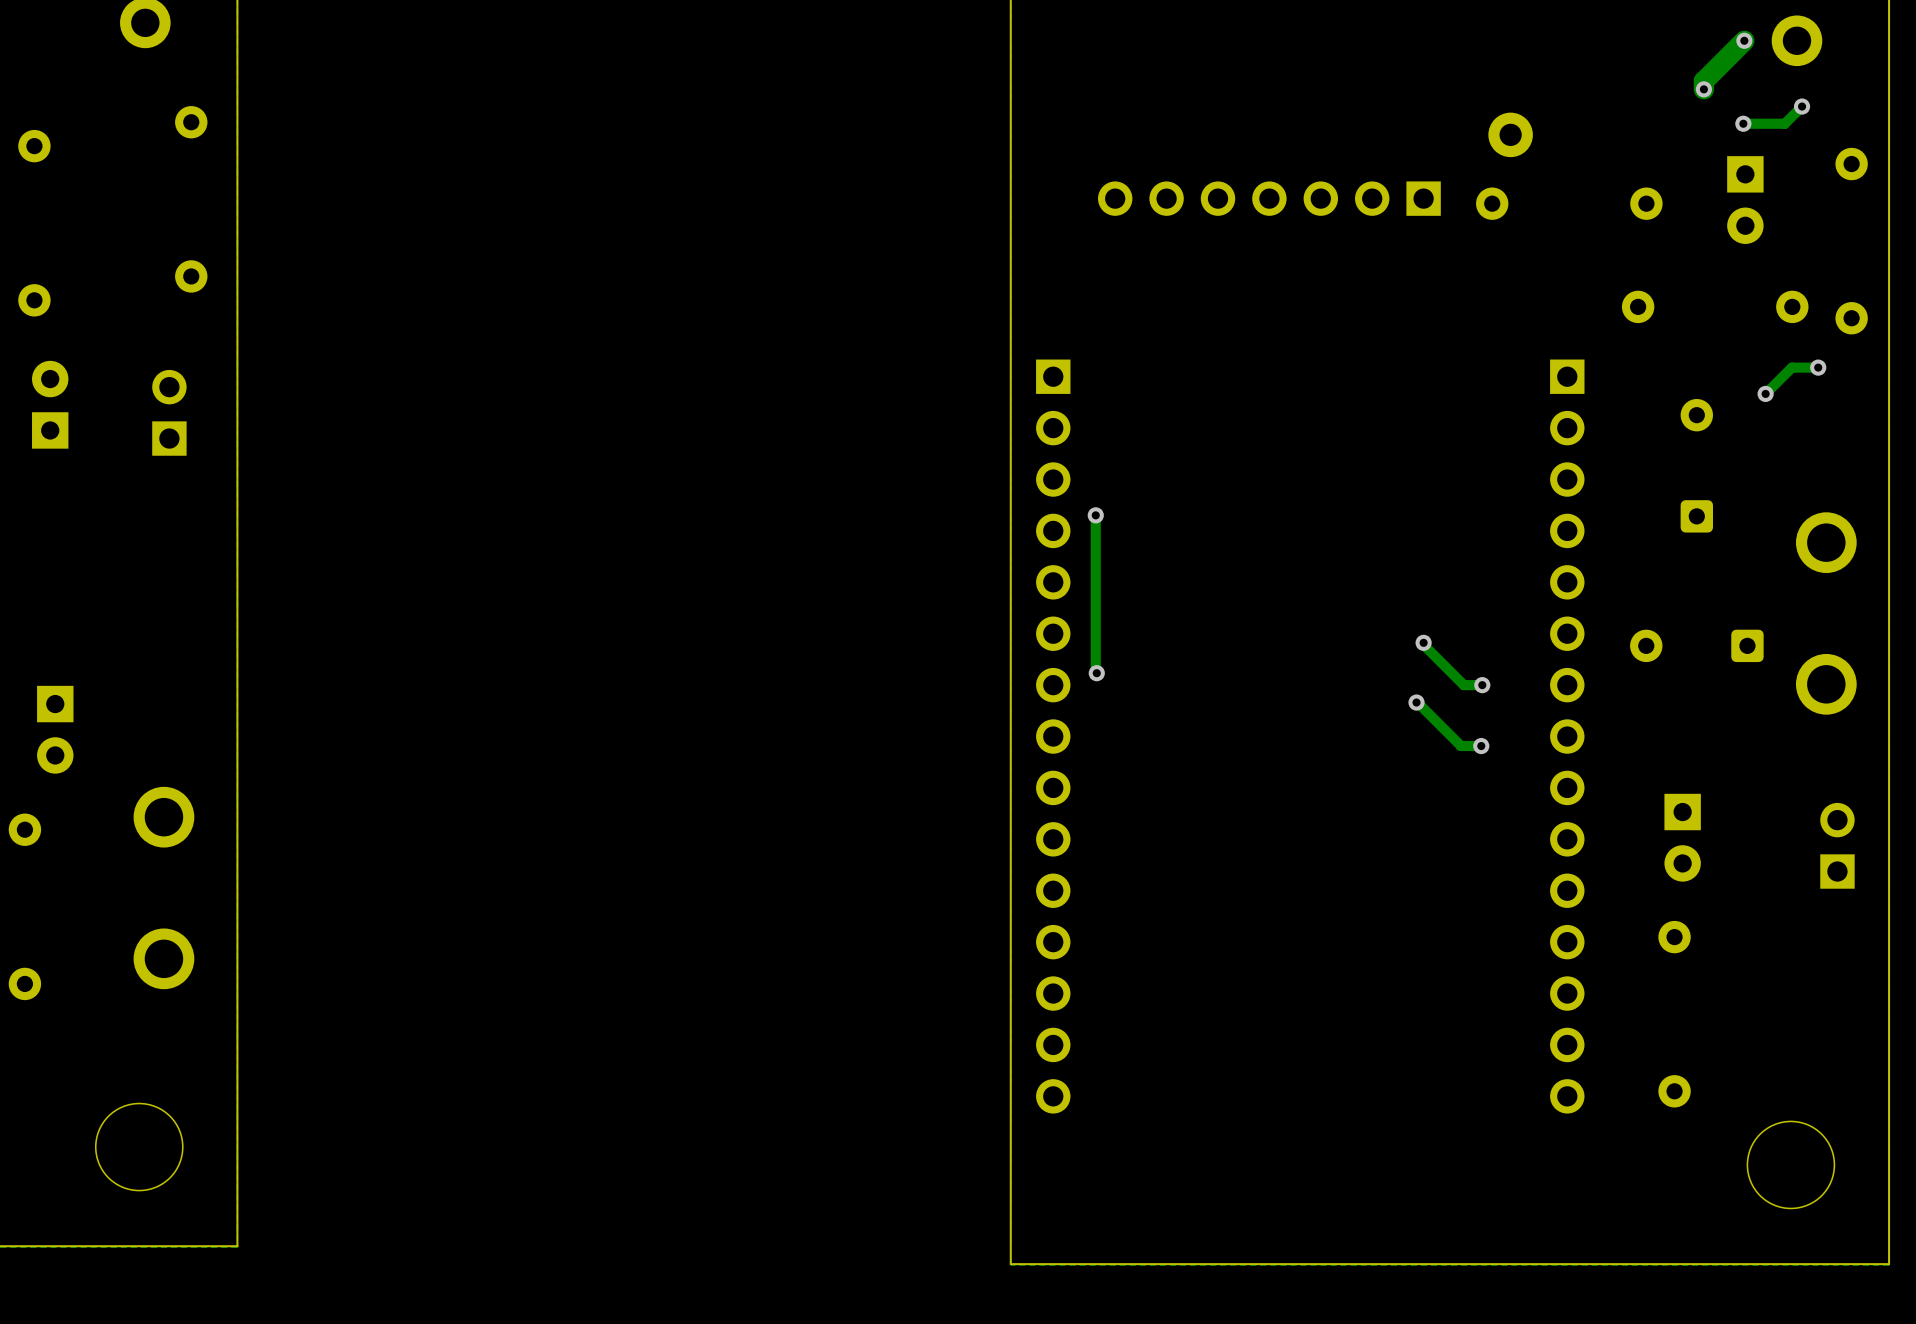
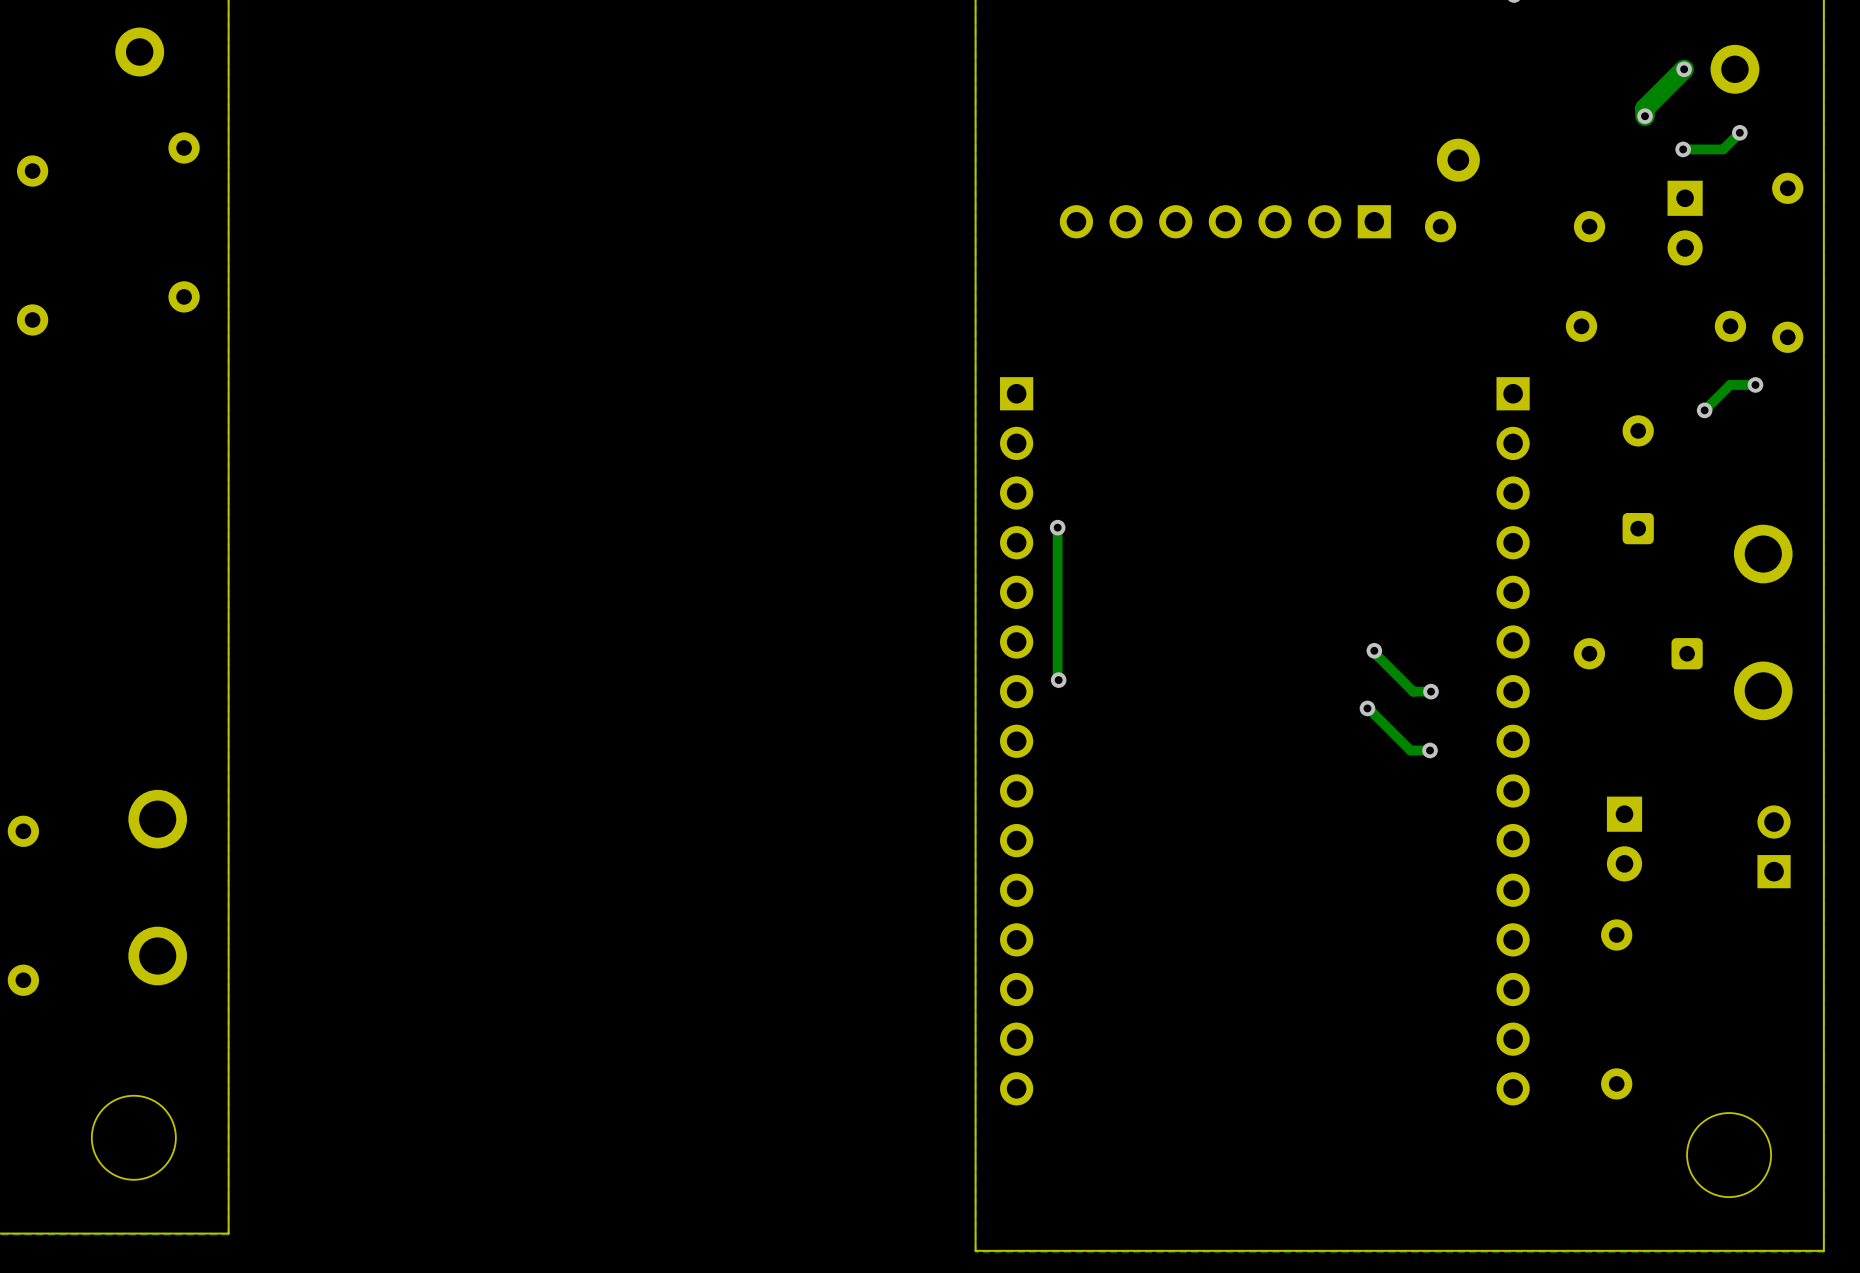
part: (50, 404) -> none
part: (169, 412) -> none
part: (55, 729) -> none

